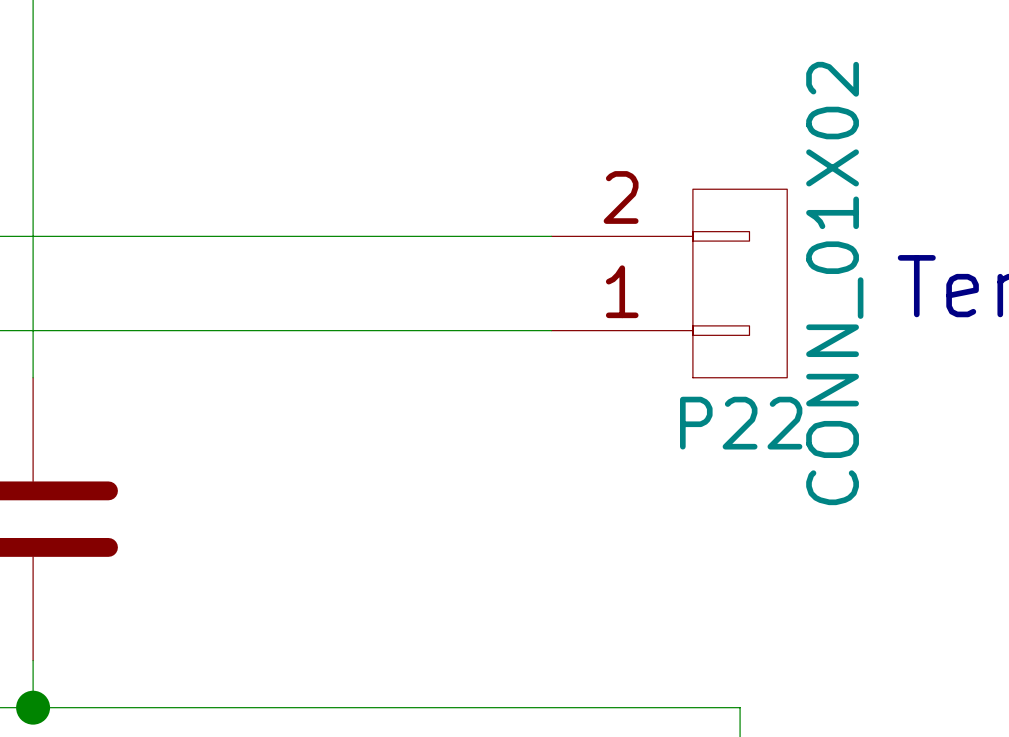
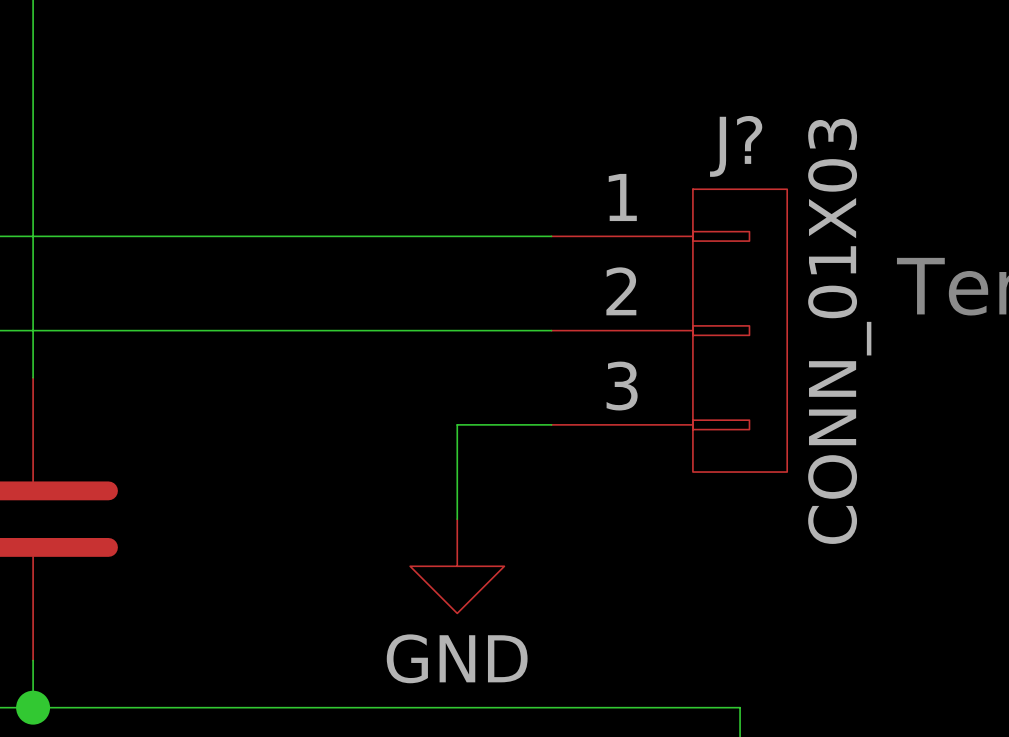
P22: CONN_01X02 (669, 283) -> none
J?: none -> CONN_01X03 (669, 330)
wire: none -> (551, 424) (457, 424) (457, 519)
power symbol: none -> GND (457, 566)

